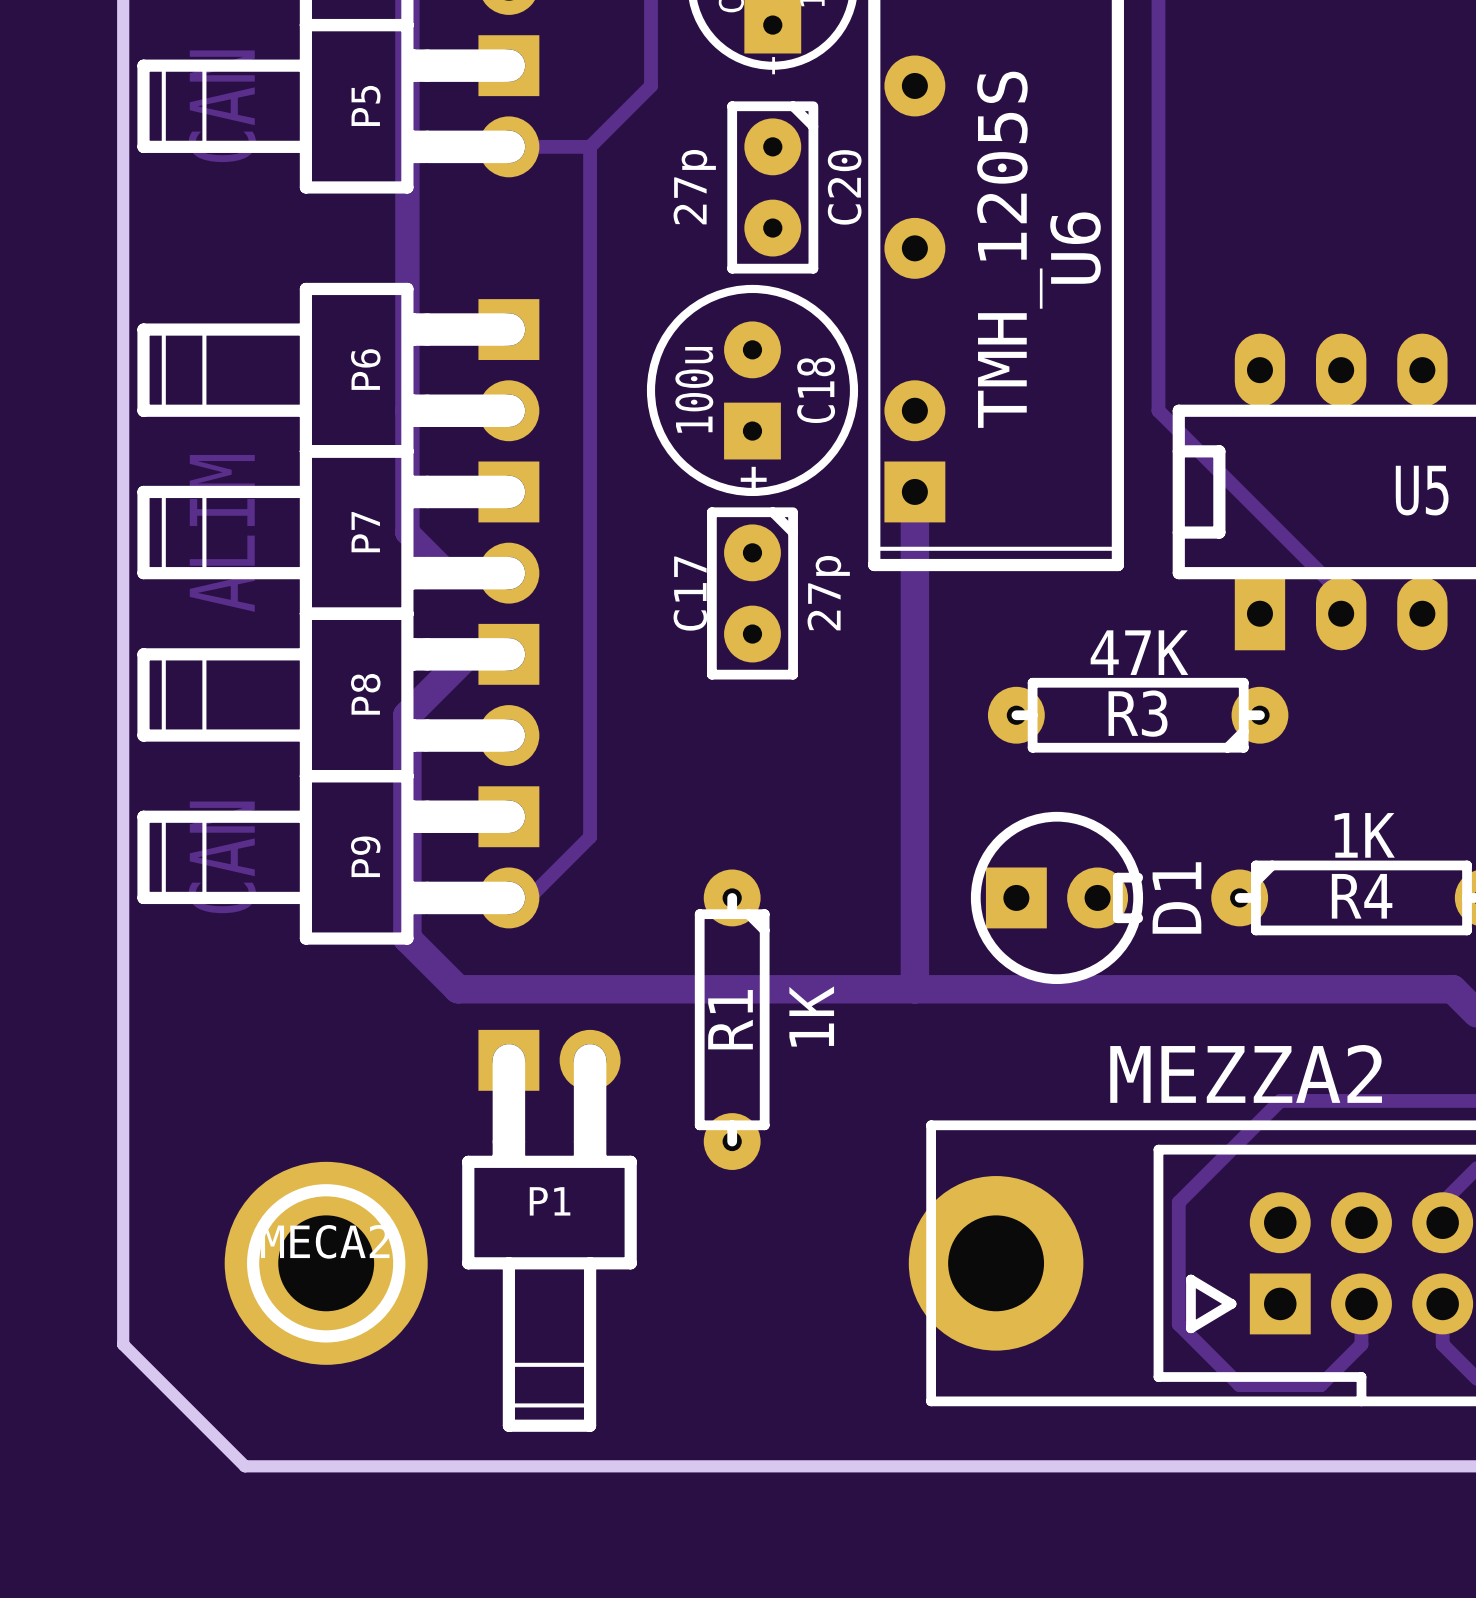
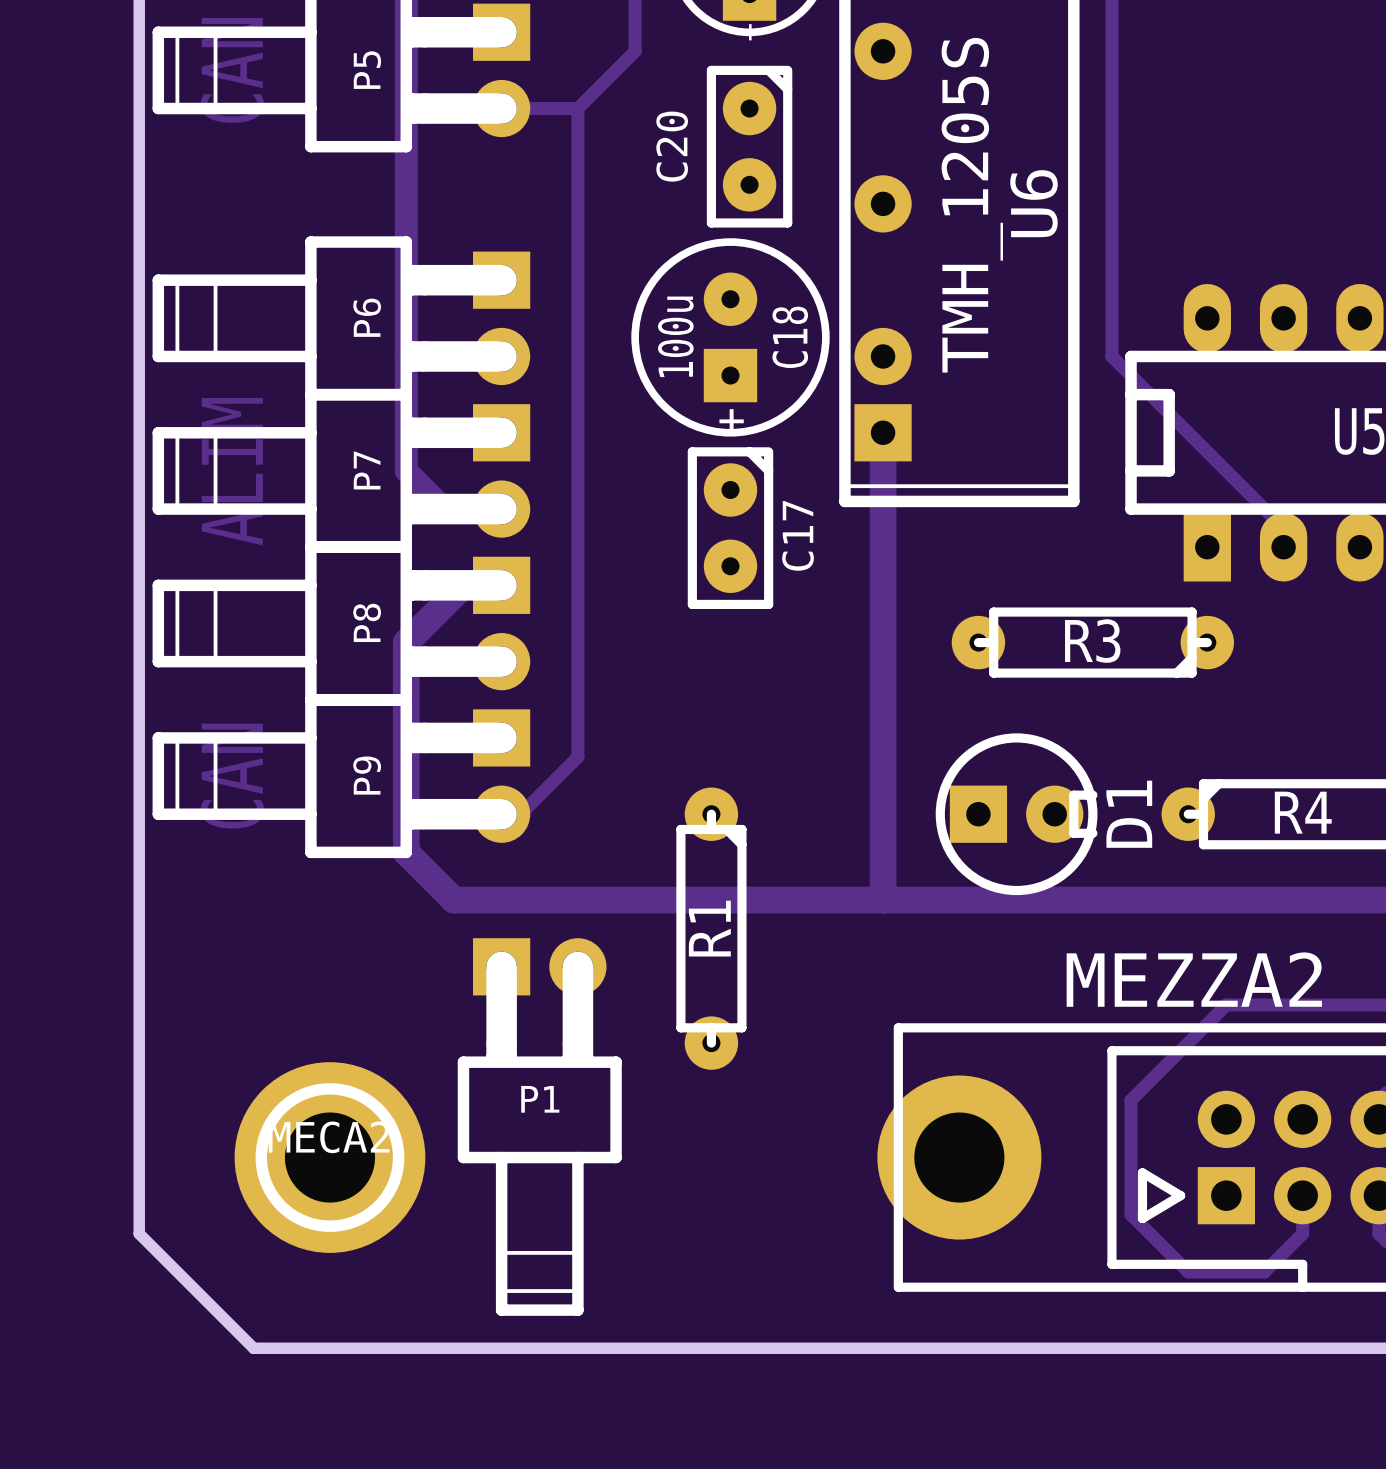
C20 value: 27p (694, 187) -> none
C20 name position: C20 (844, 187) -> C20 (672, 146)
C17 name position: C17 (690, 593) -> C17 (798, 535)
C17 value: 27p (828, 593) -> none
R3 value: 47K (1139, 652) -> none
R4 value: 1K (1364, 835) -> none
R1 value: 1K (811, 1016) -> none

